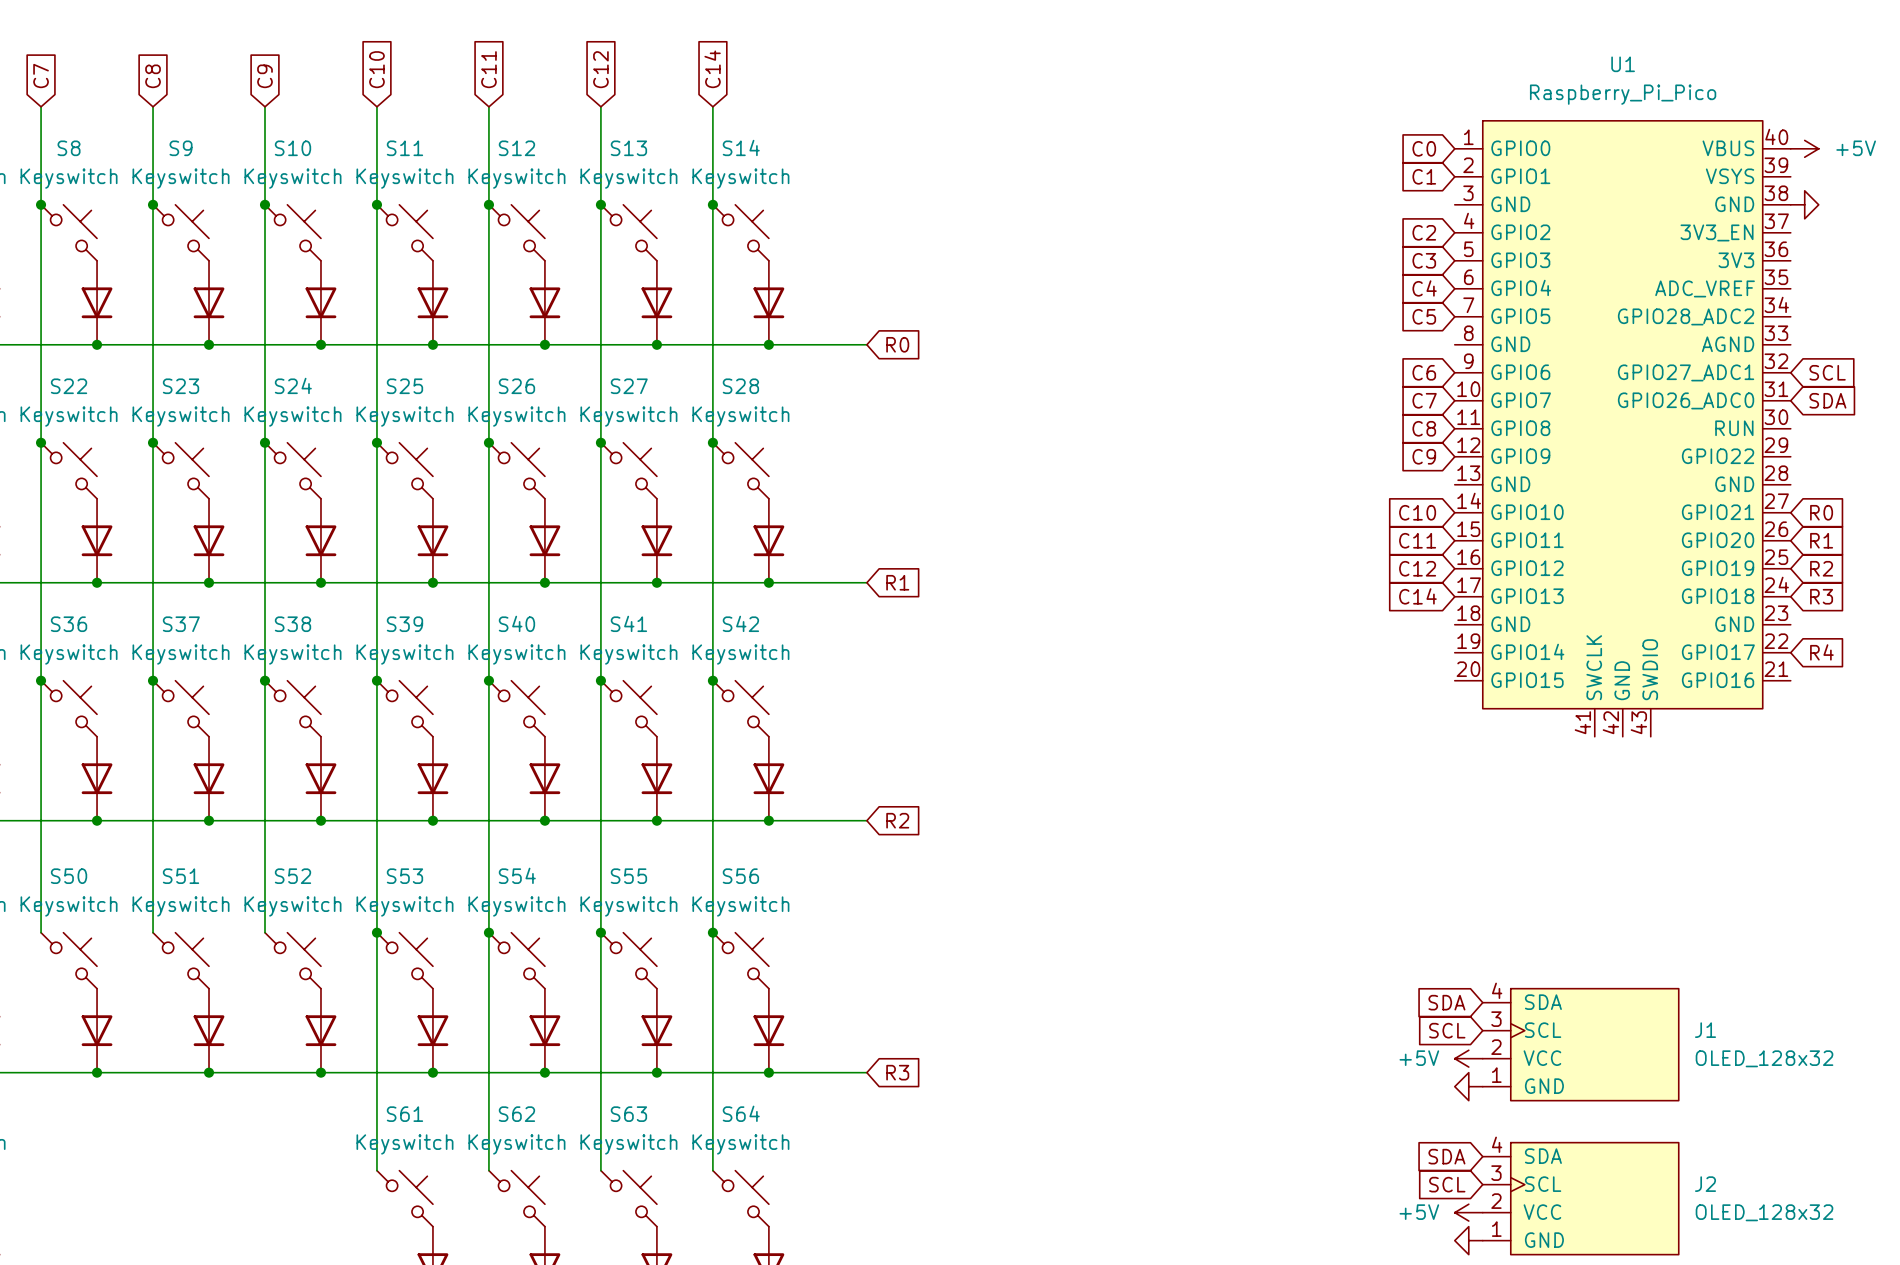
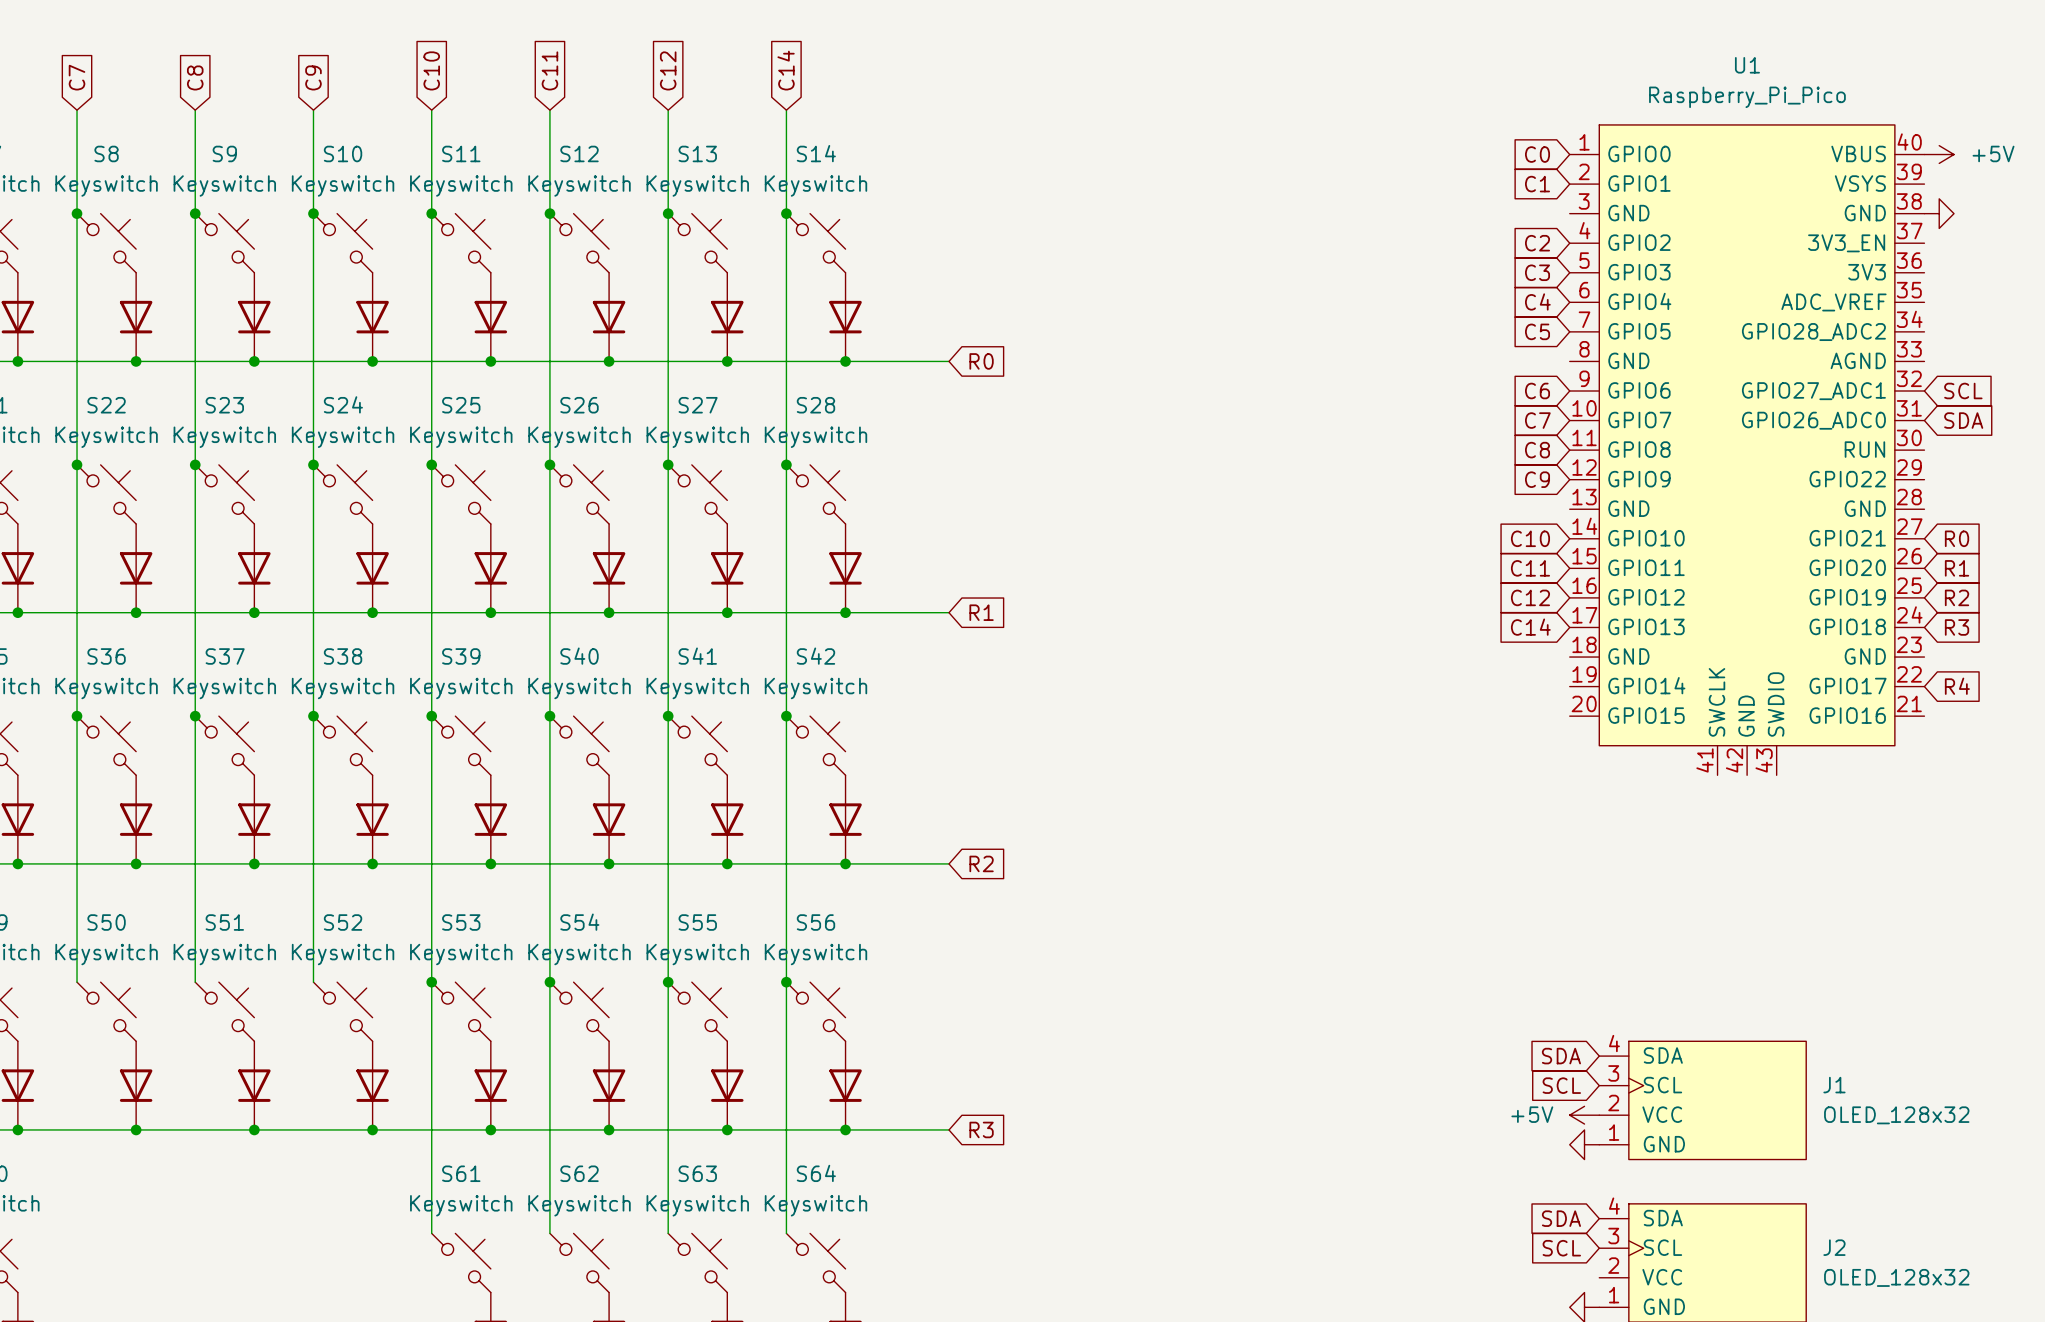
power symbol: +5V (1468, 1212) -> none

